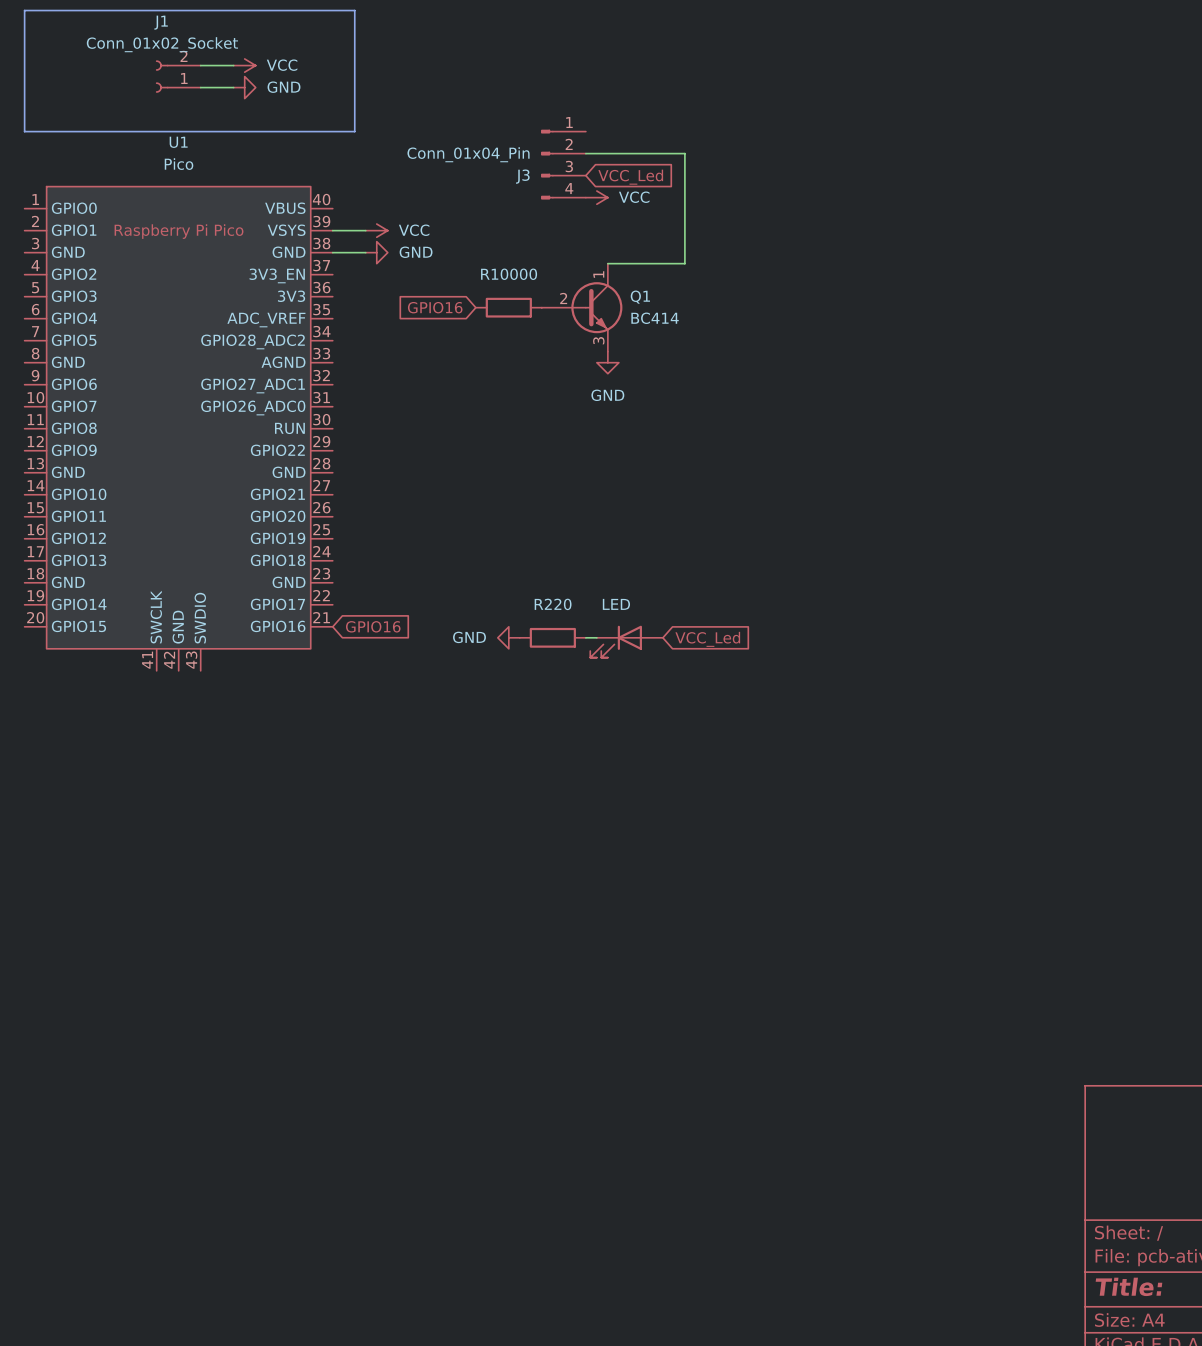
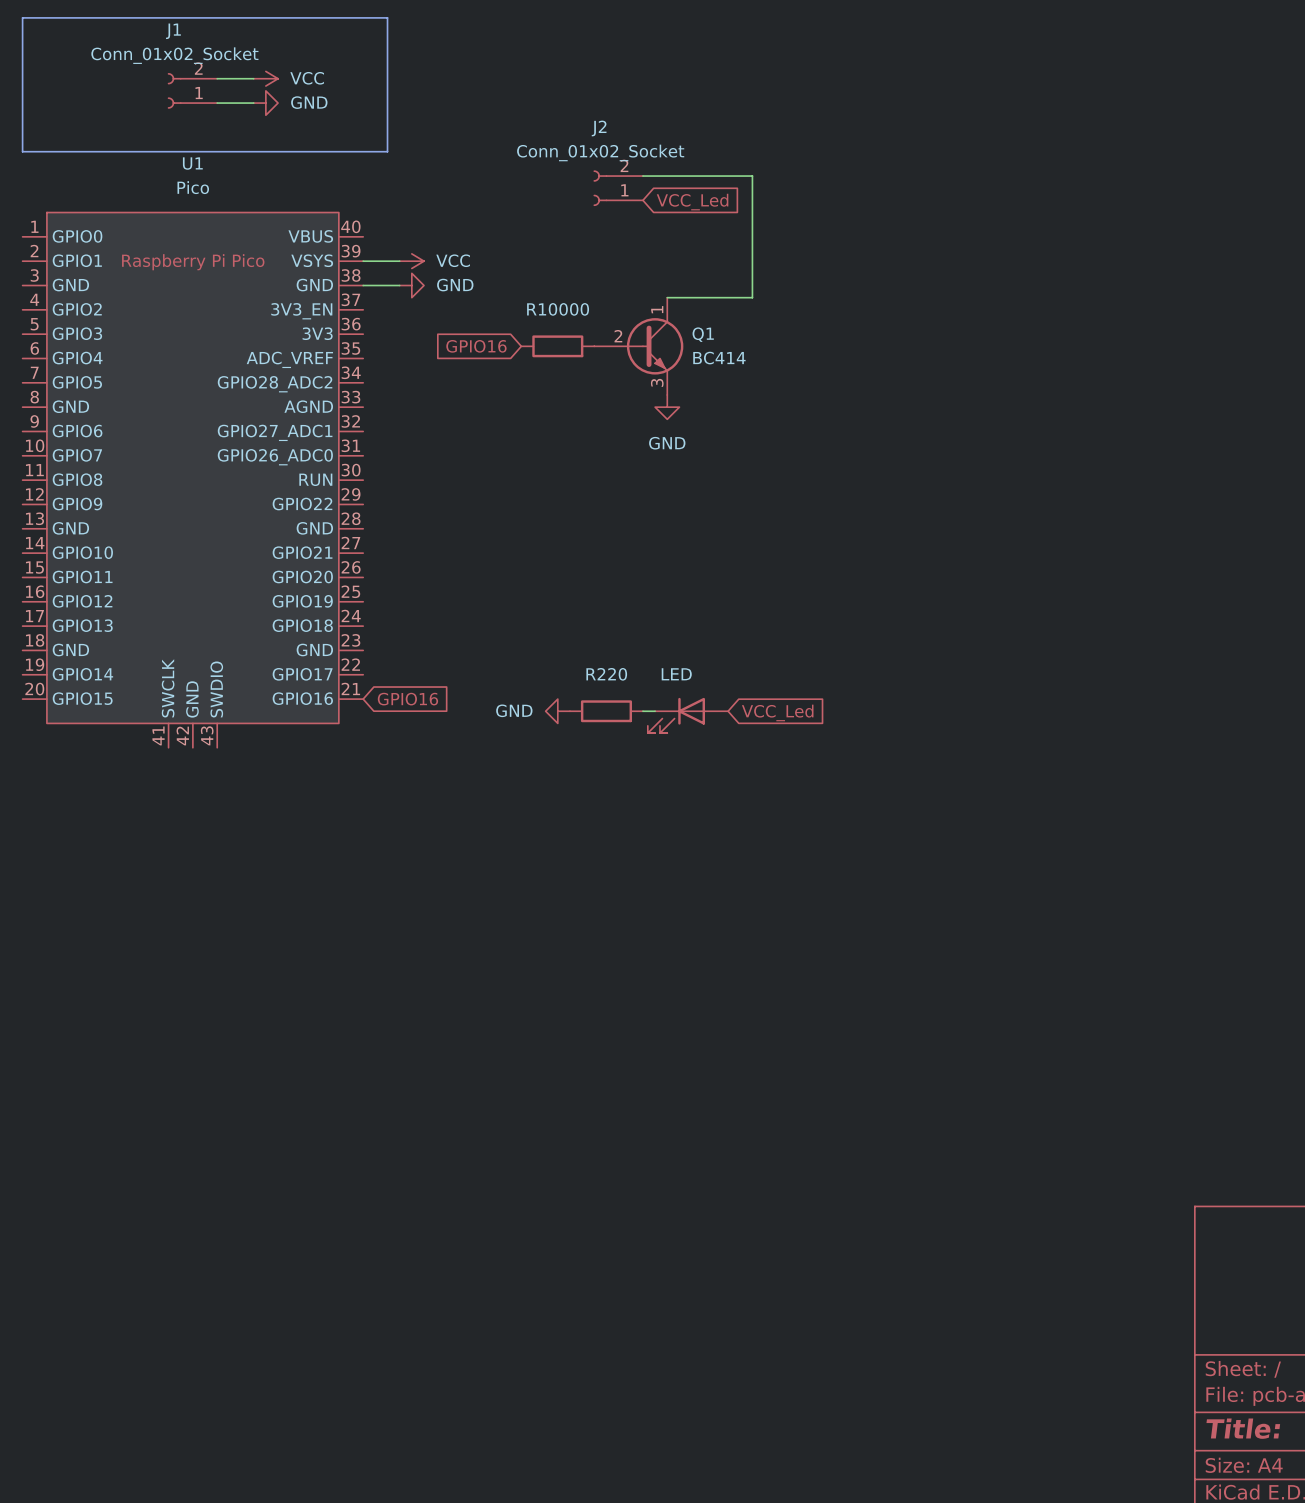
J3: Conn_01x04_Pin (563, 164) -> none
J2: none -> Conn_01x02_Socket (618, 188)
power symbol: VCC (596, 197) -> none

